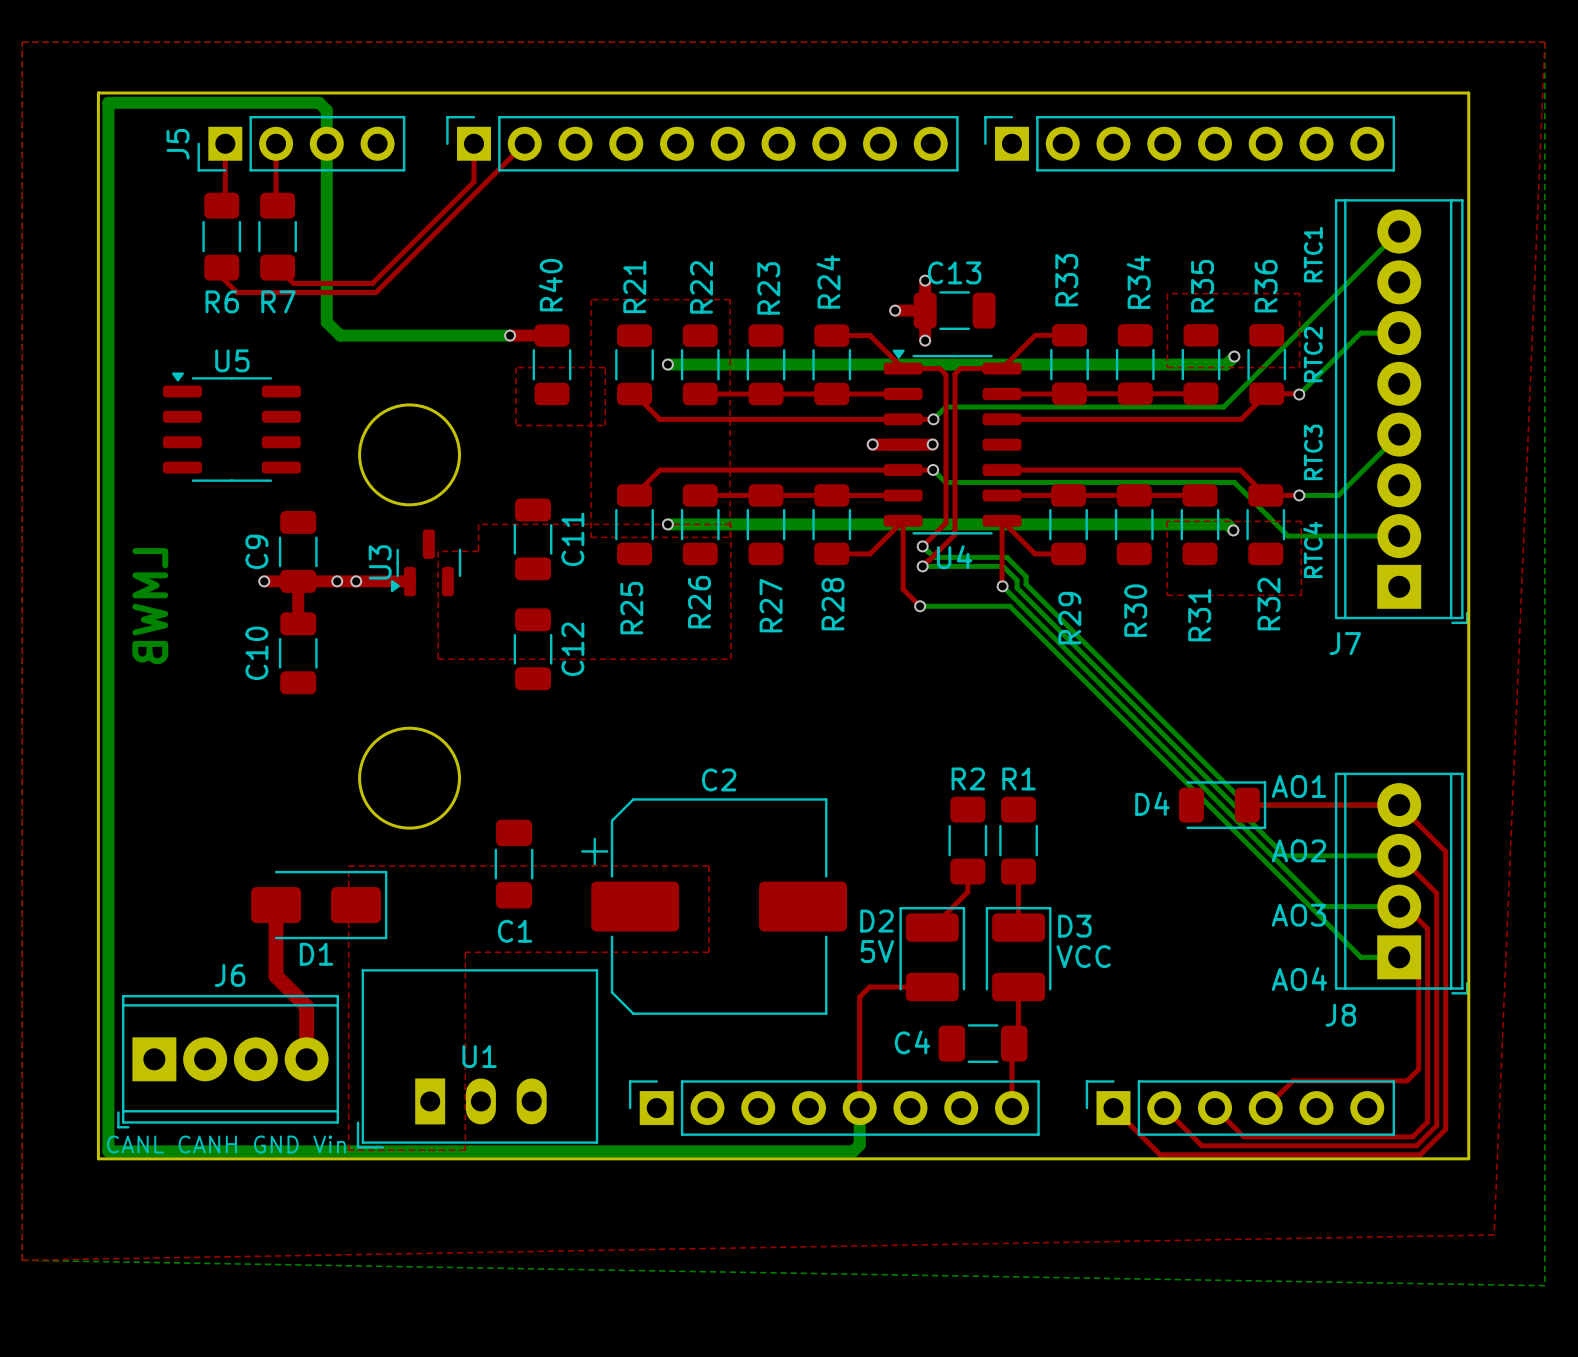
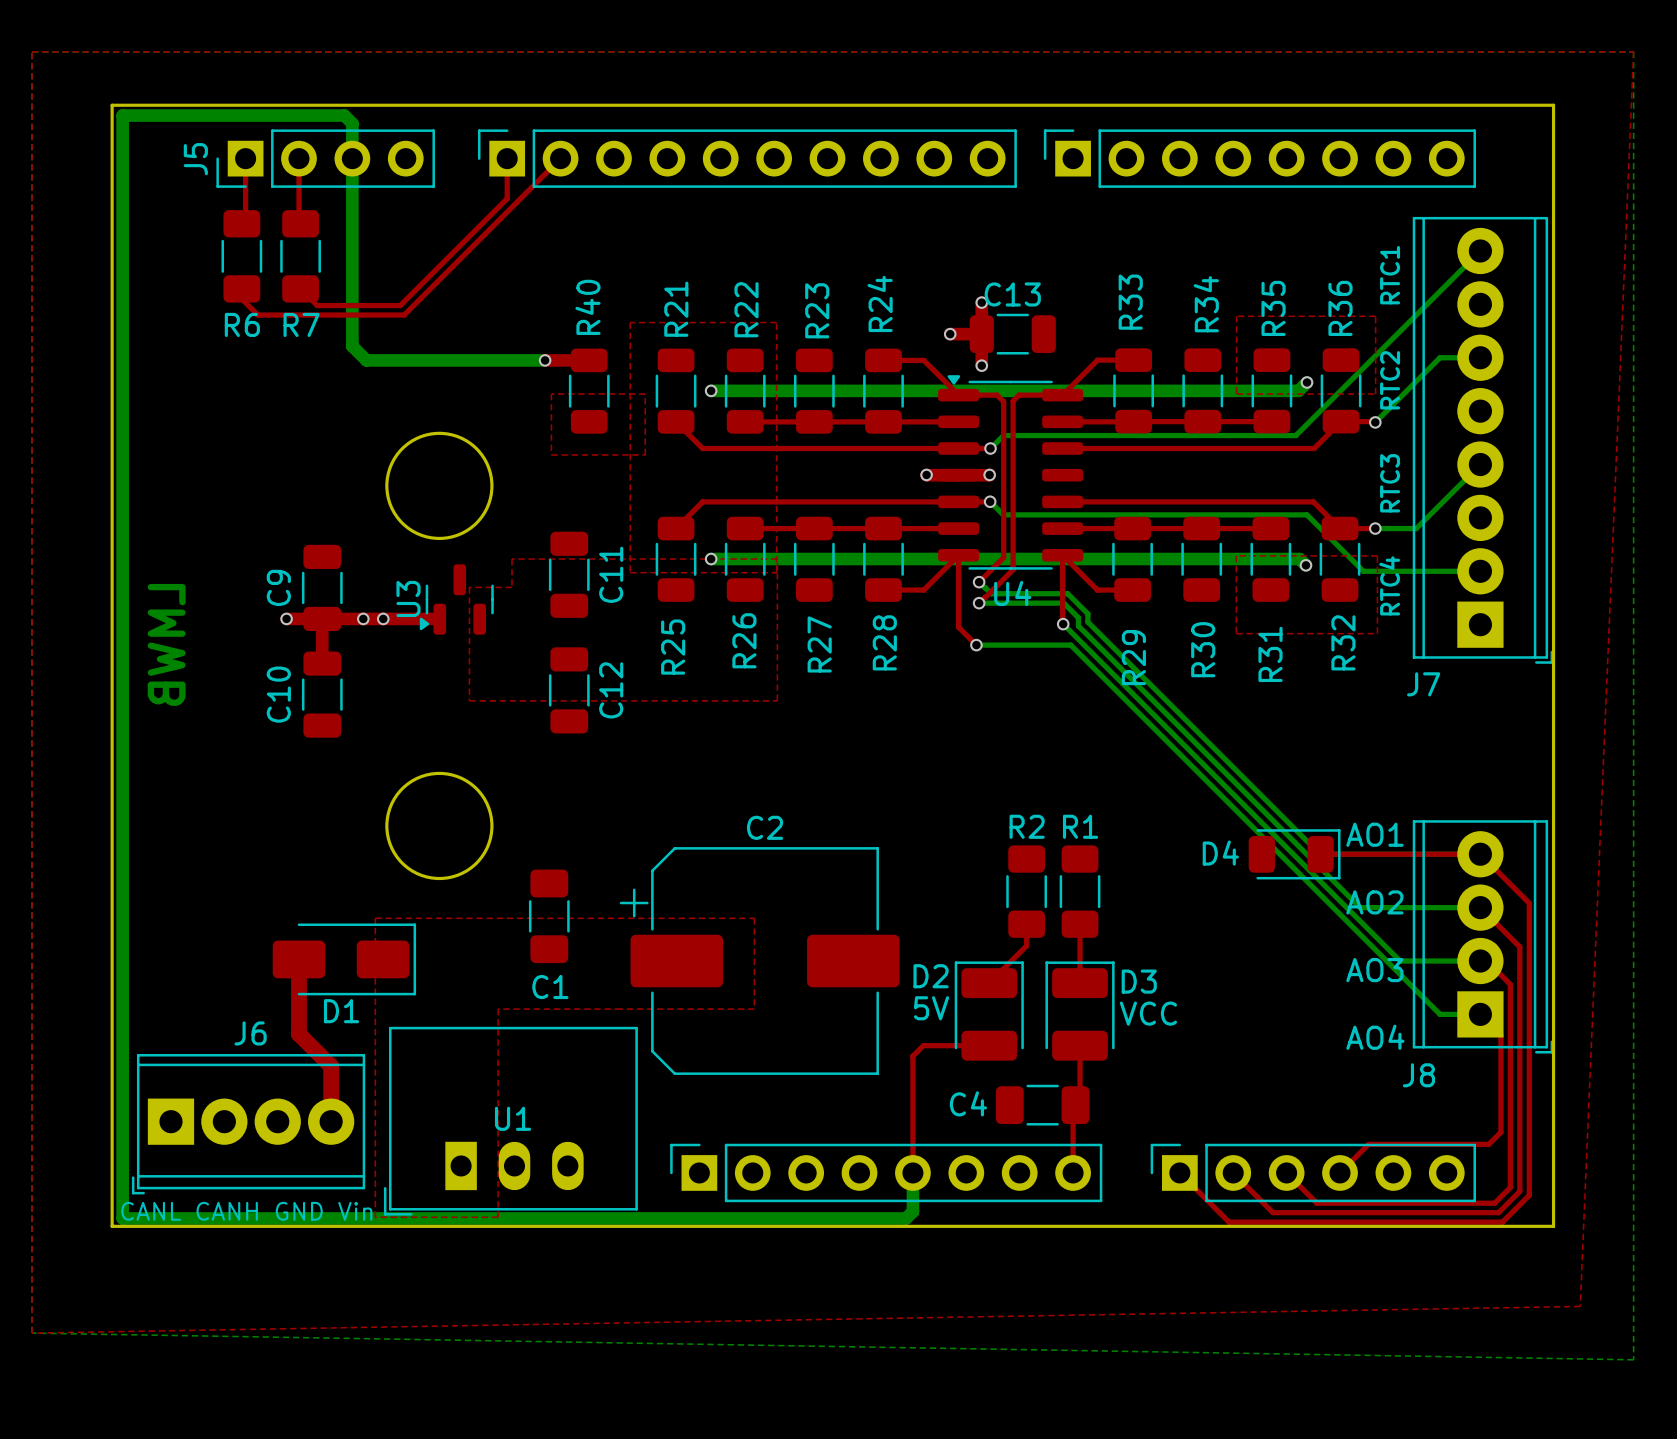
U5: (231, 427) -> none

